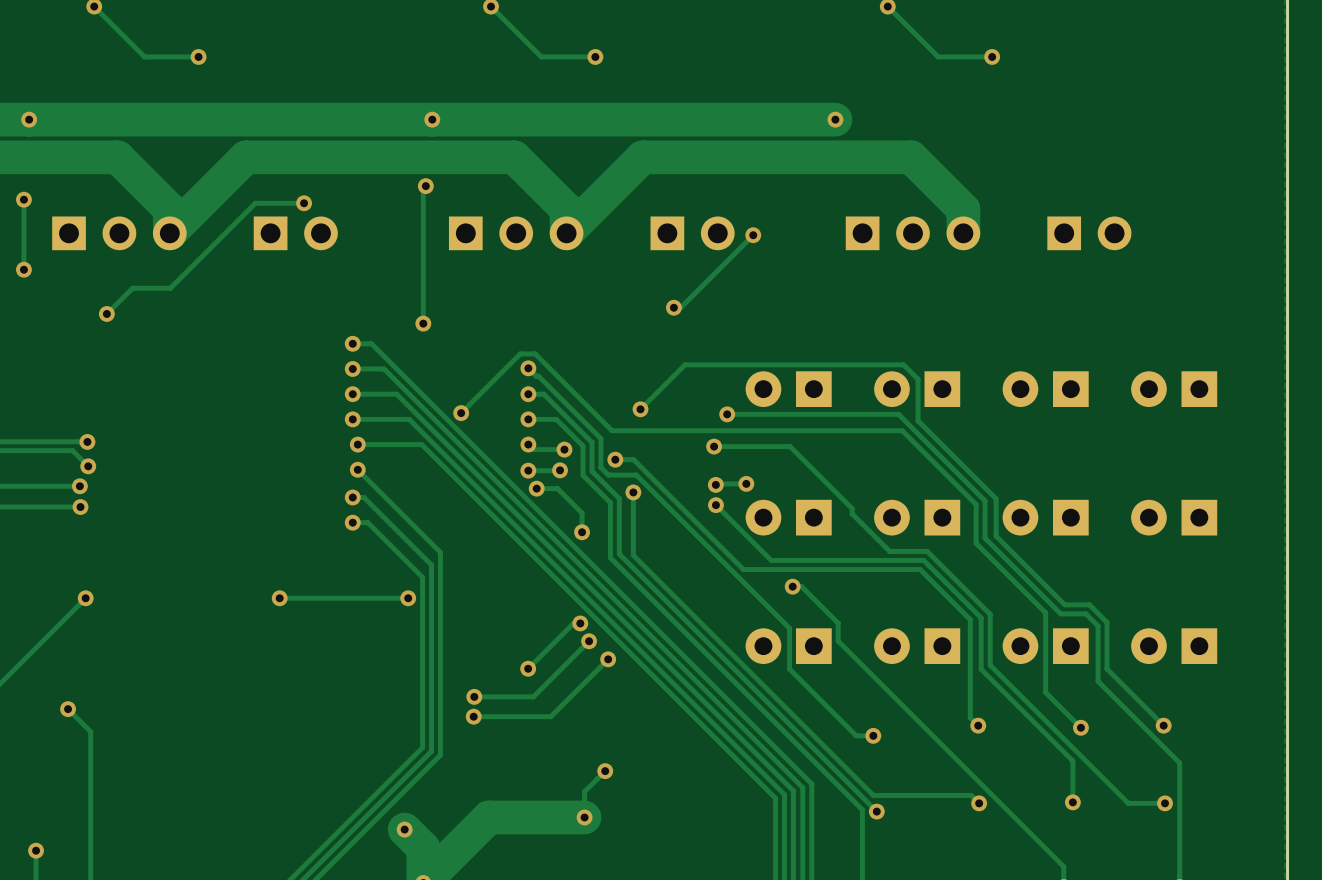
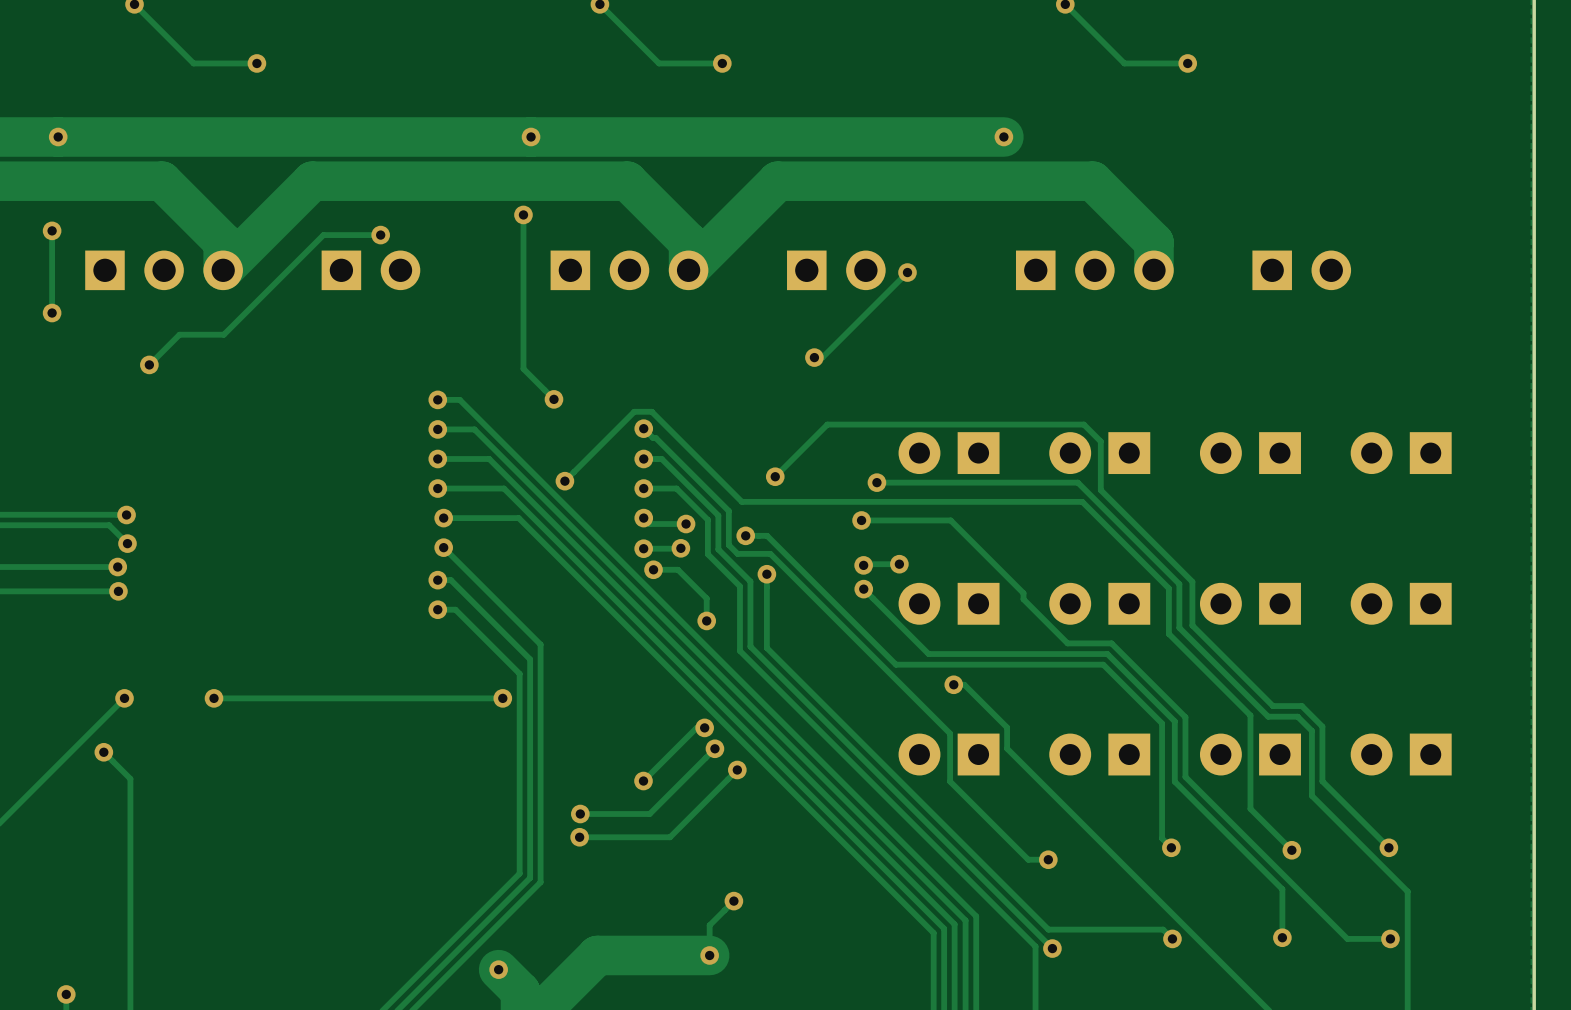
track: (425, 186) (423, 188) (423, 323) -> (523, 214) (523, 368) (553, 399)
via position: (423, 323) -> (553, 399)
via: none -> (214, 698)
track: none -> (352, 698) (214, 698)
via: (279, 598) -> none
track: (68, 709) (90, 731) -> (103, 752) (130, 778) (130, 855)
via position: (68, 709) -> (103, 752)

